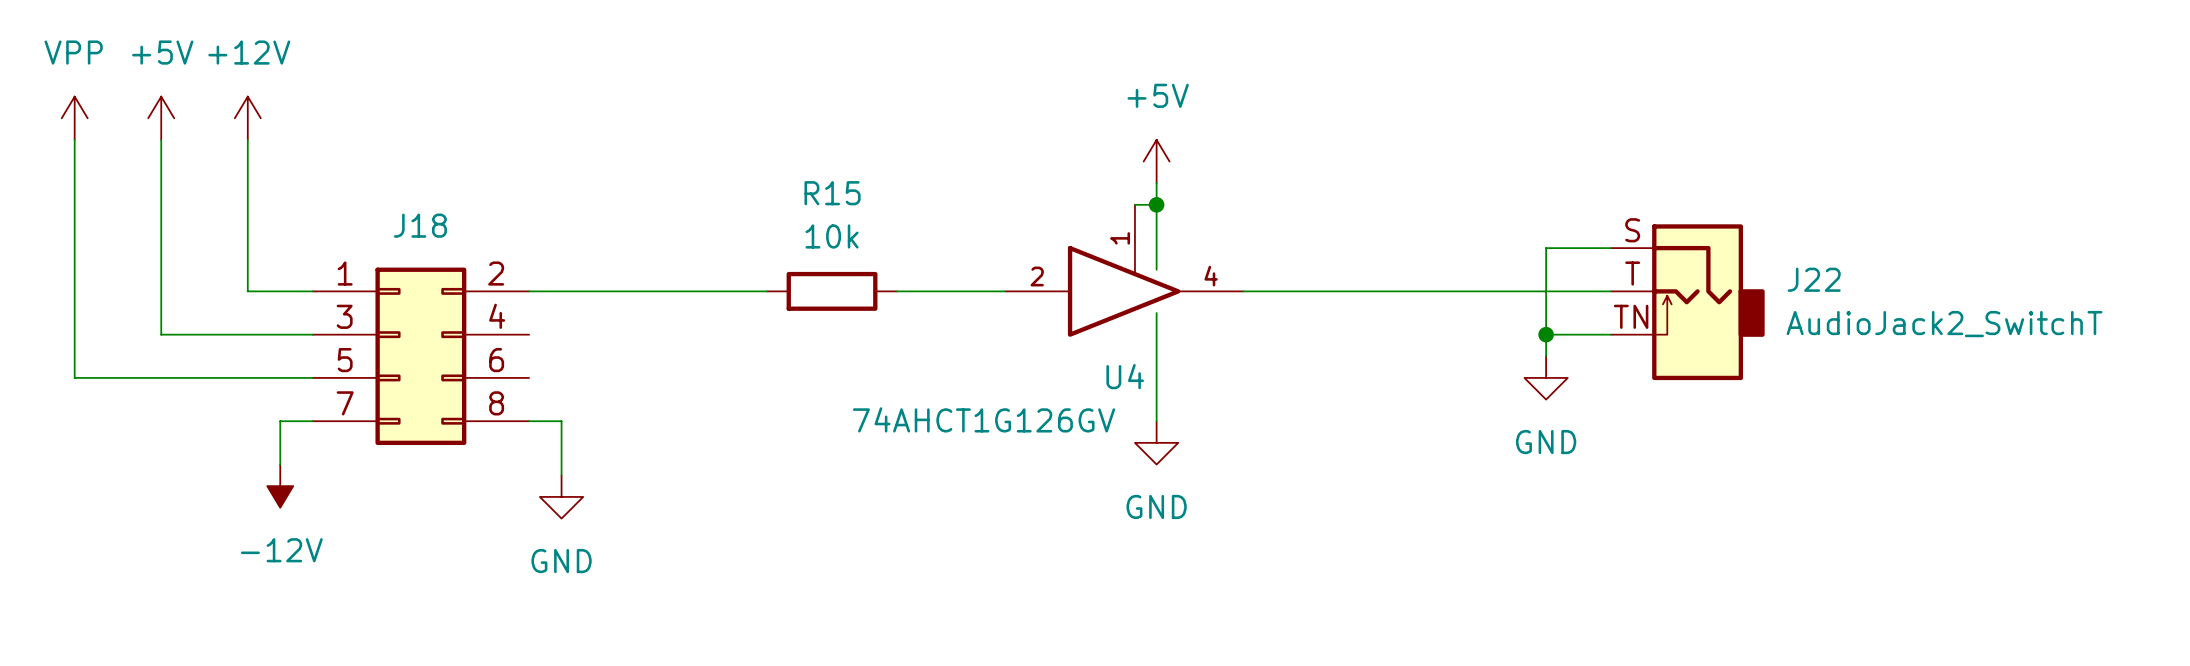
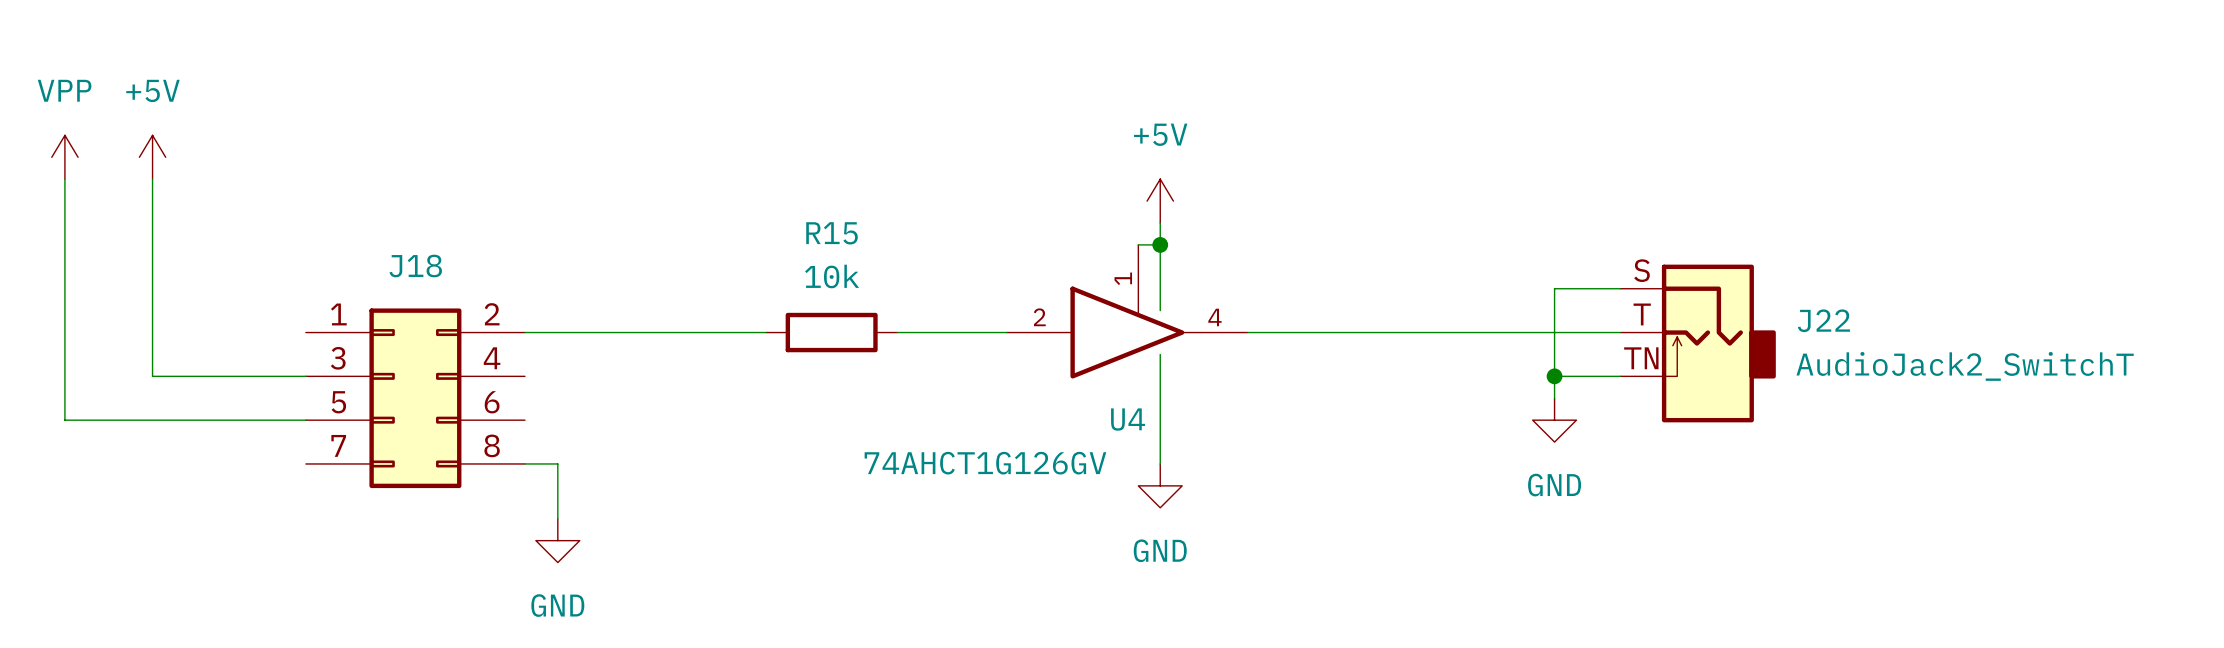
power symbol: +12V (247, 118) -> none
wire: (247, 139) (247, 291) (312, 291) -> none
wire: (312, 421) (280, 421) (280, 464) -> none
power symbol: -12V (280, 486) -> none

